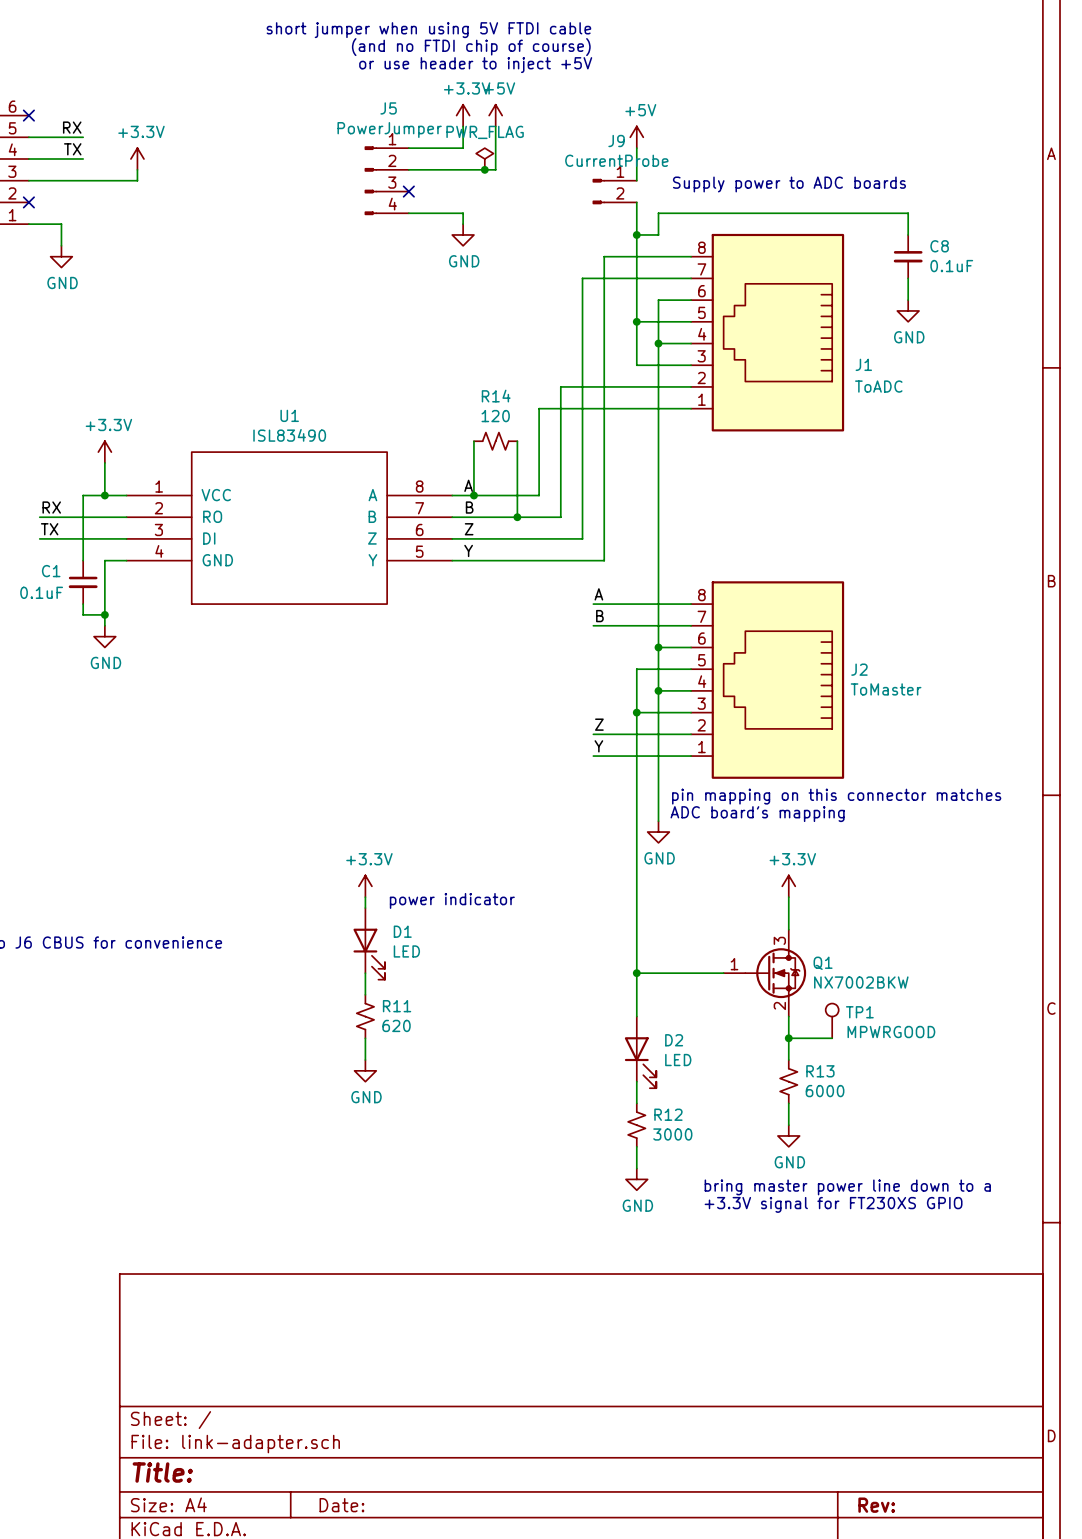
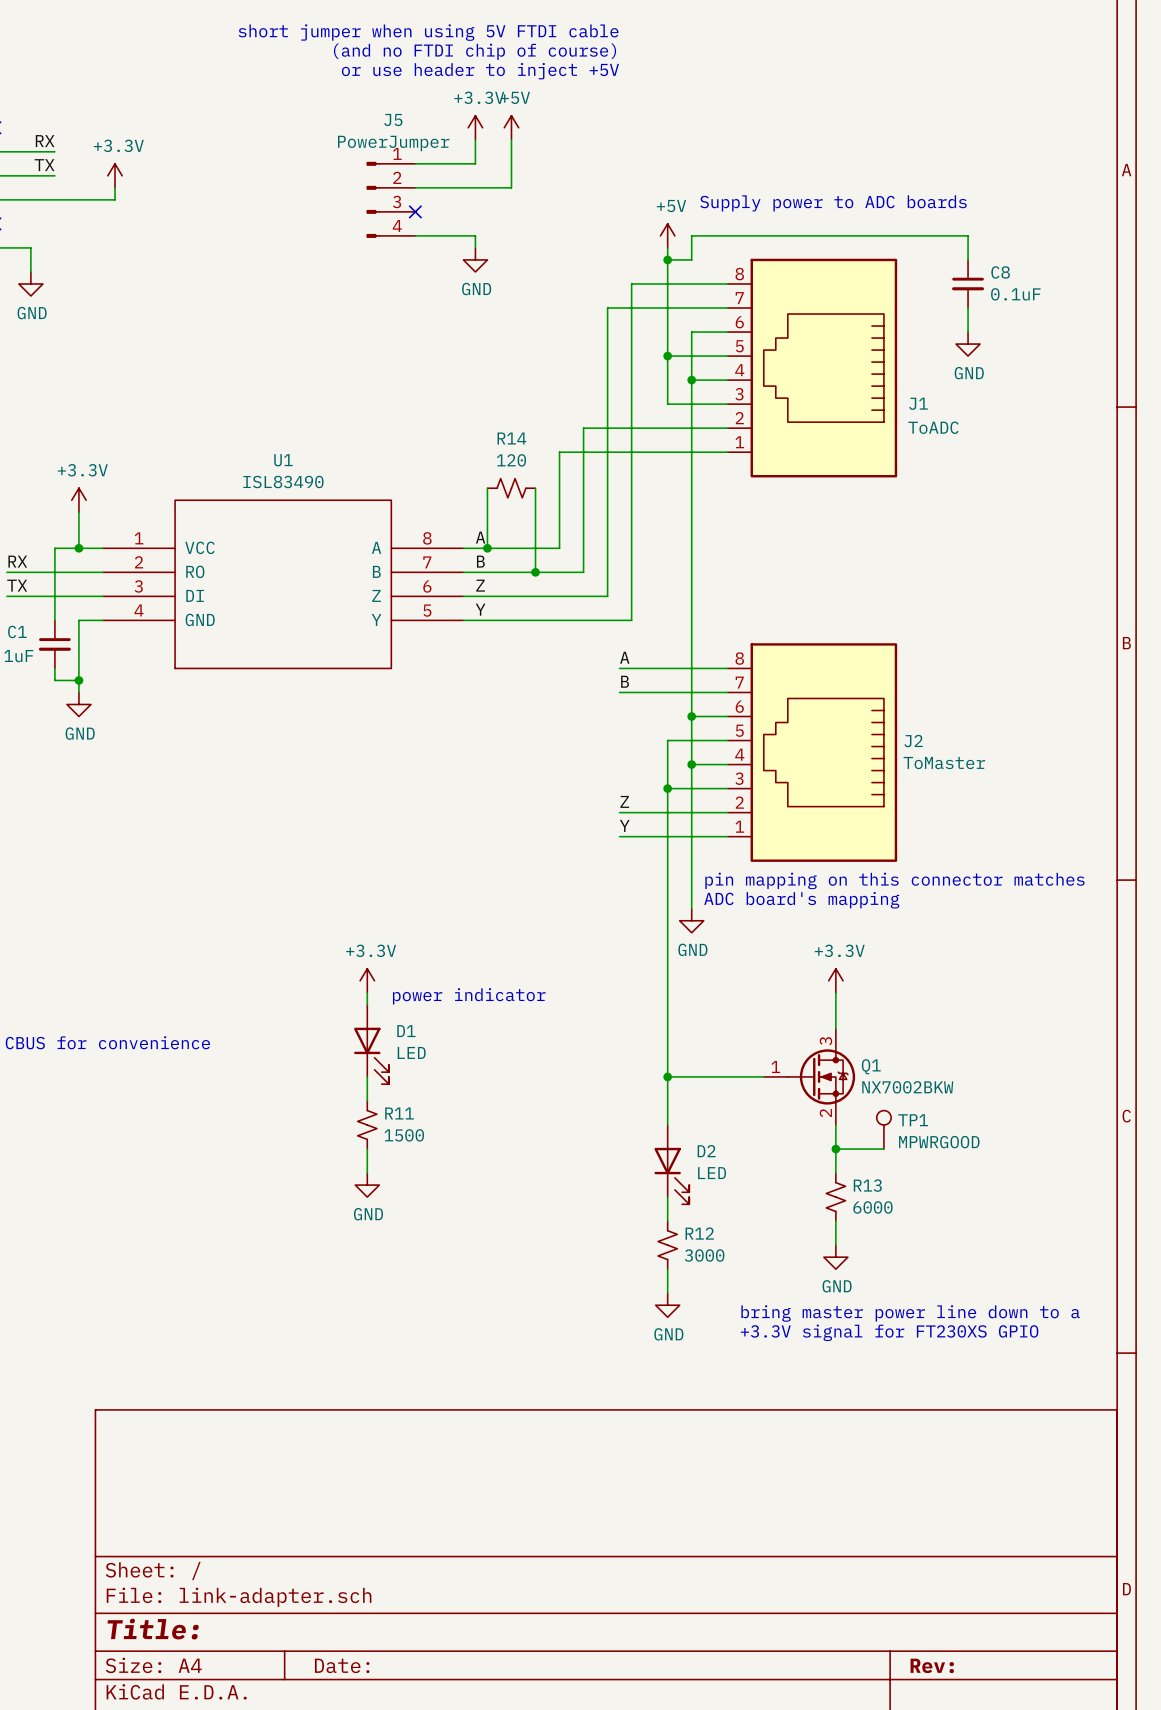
power symbol position: +5V (636, 137) -> +5V (667, 235)
wire: (636, 148) (636, 180) -> none
power symbol: PWR_FLAG (484, 158) -> none
junction: (484, 169) -> none
J9: CurrentProbe (614, 191) -> none
R11 value: 620 (396, 1025) -> 1500 (404, 1135)

